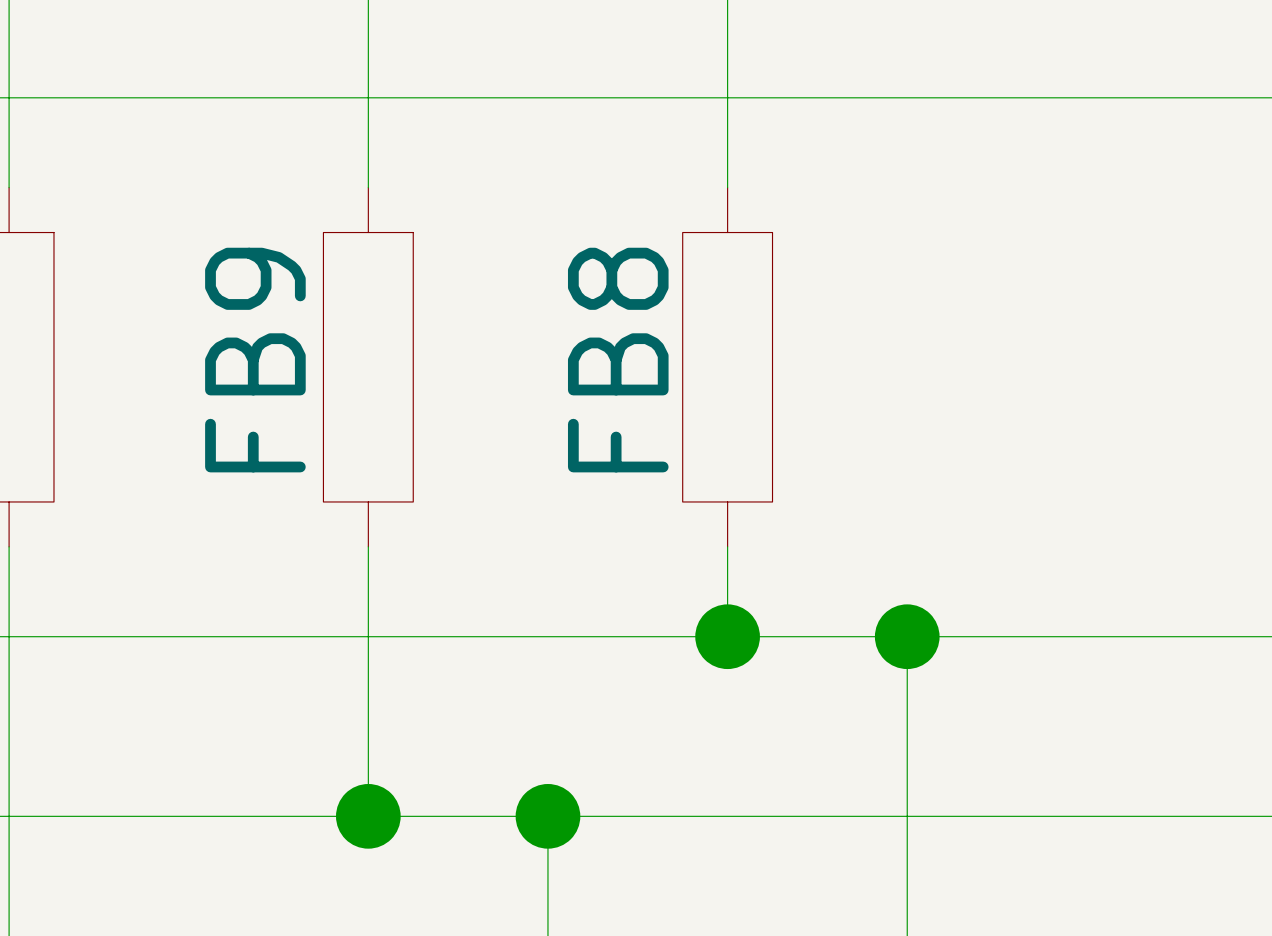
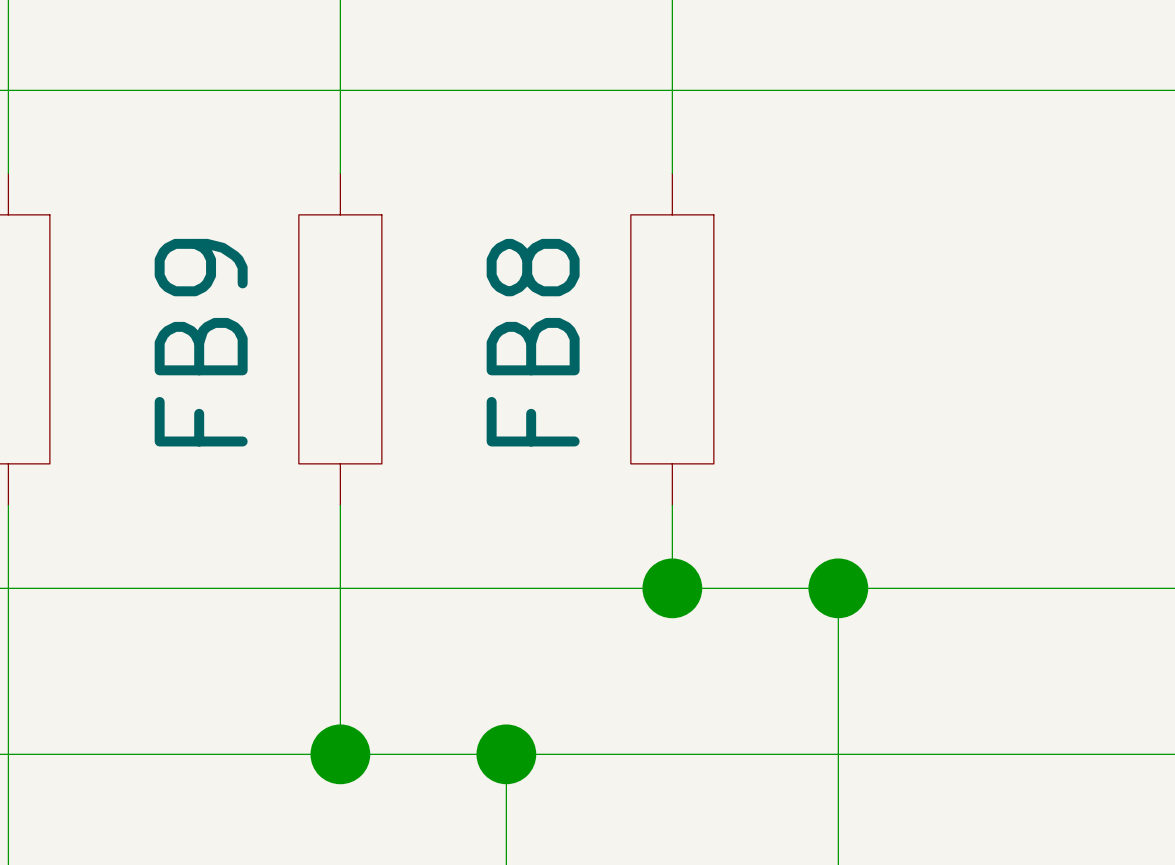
FB9 name position: FB9 (255, 360) -> FB9 (201, 342)
FB8 name position: FB8 (618, 360) -> FB8 (533, 342)

